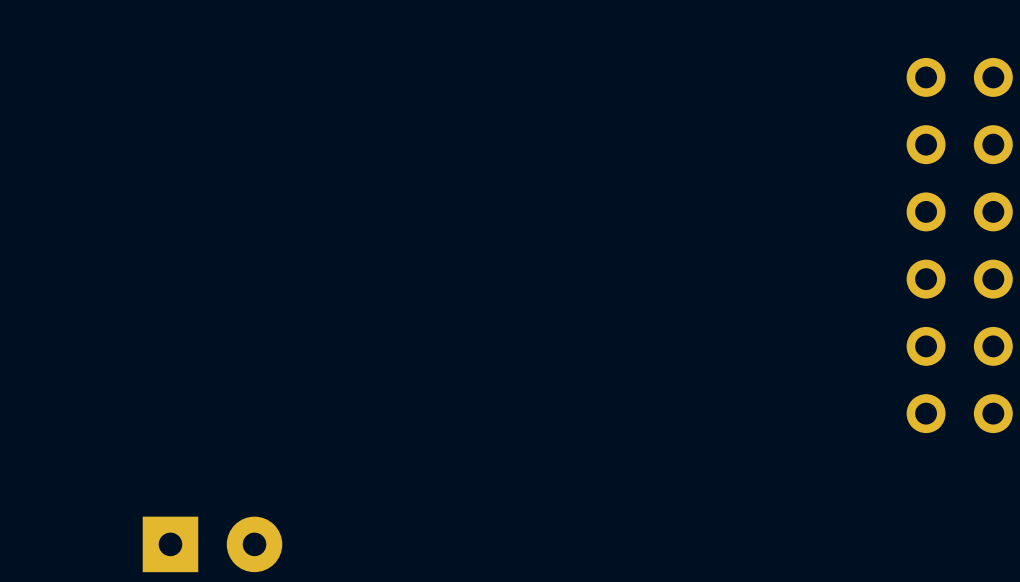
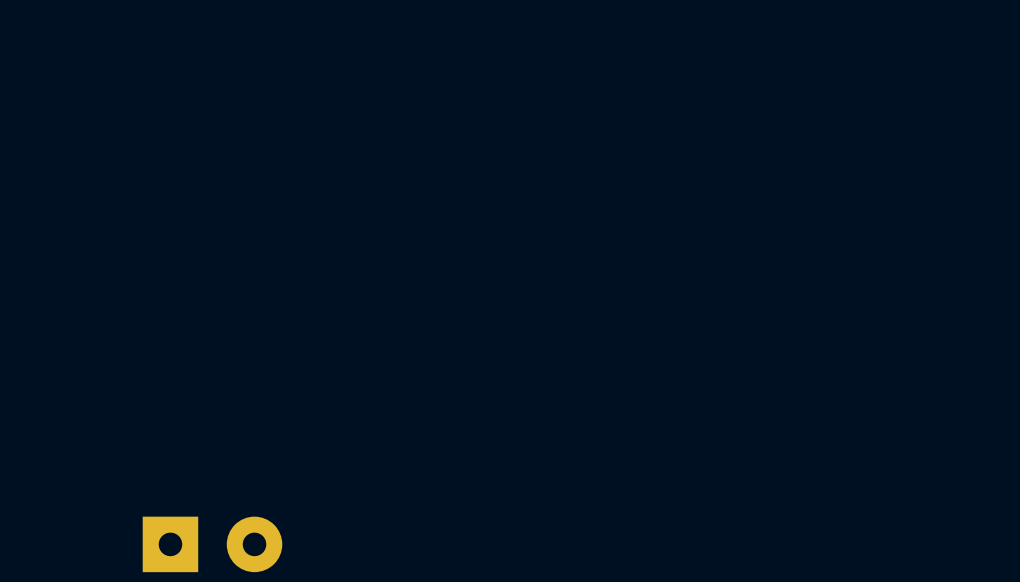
part: (959, 245) -> none

